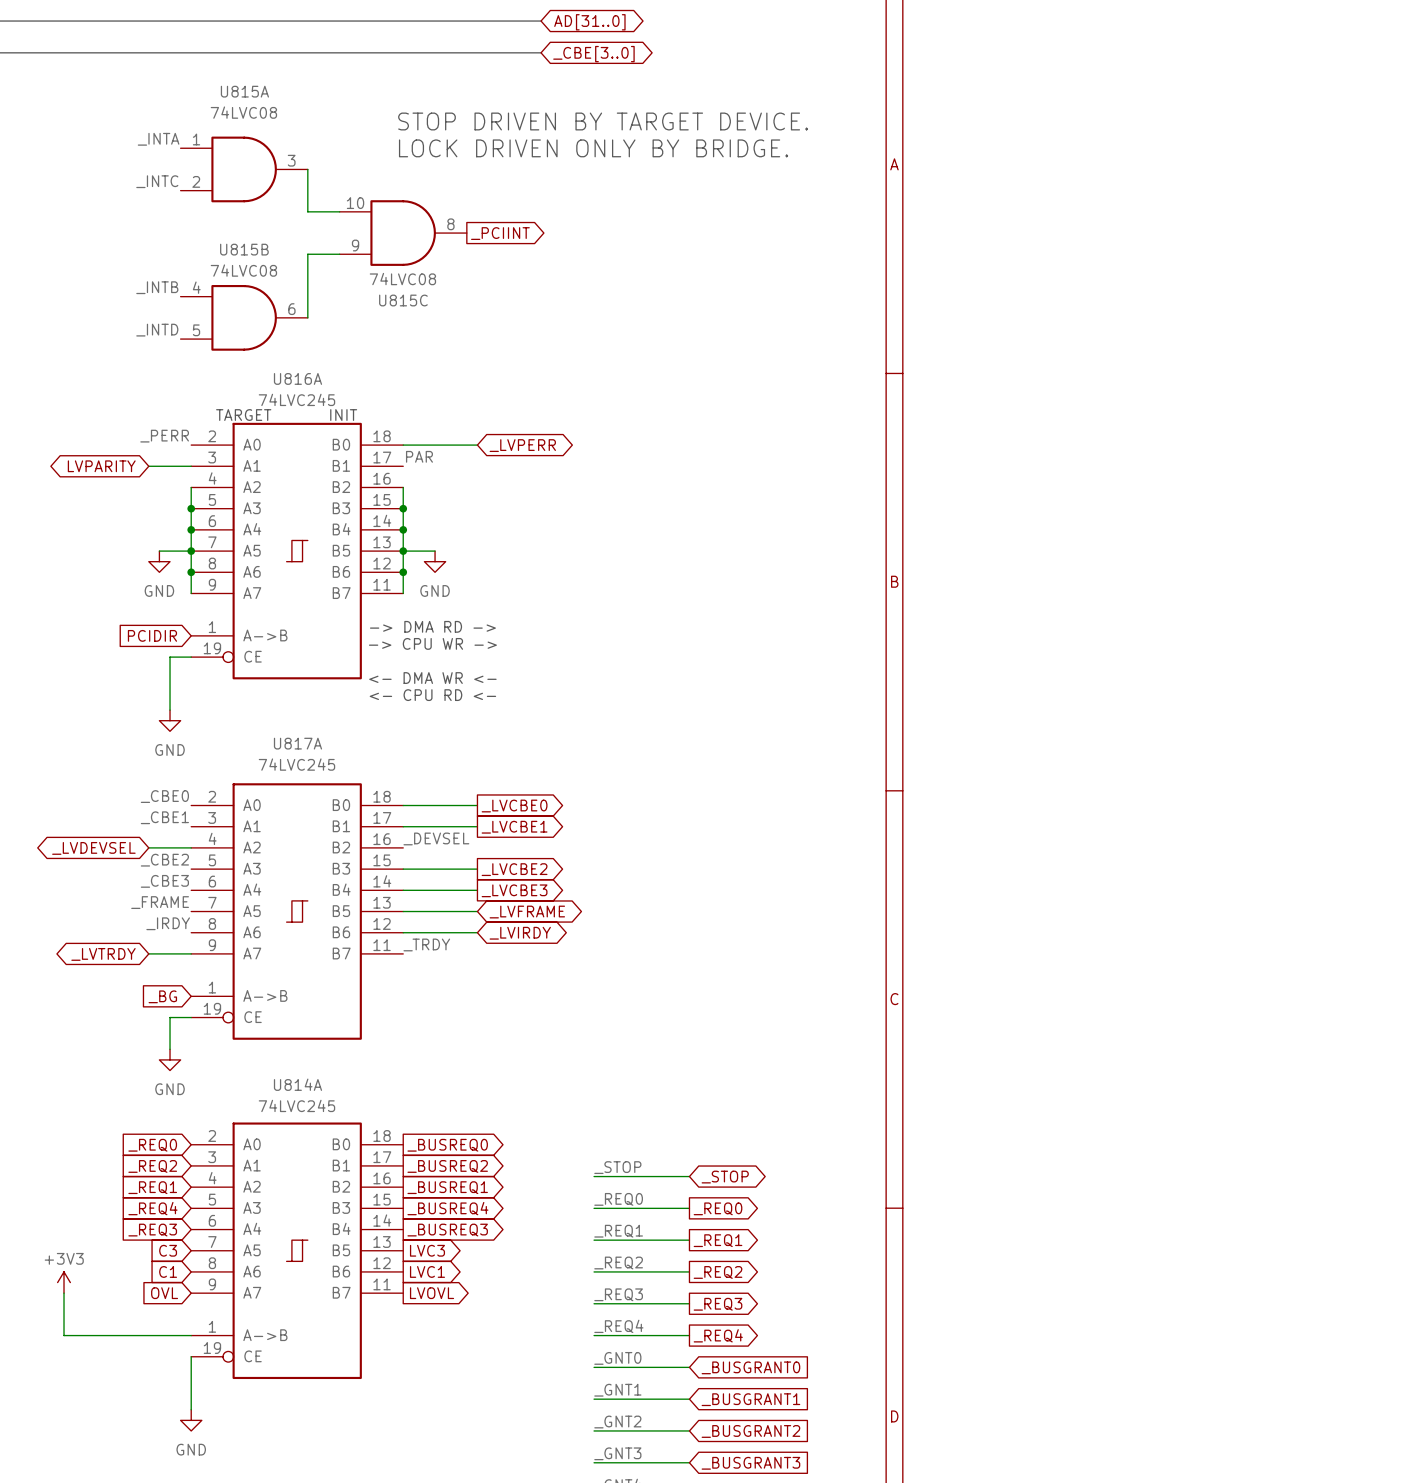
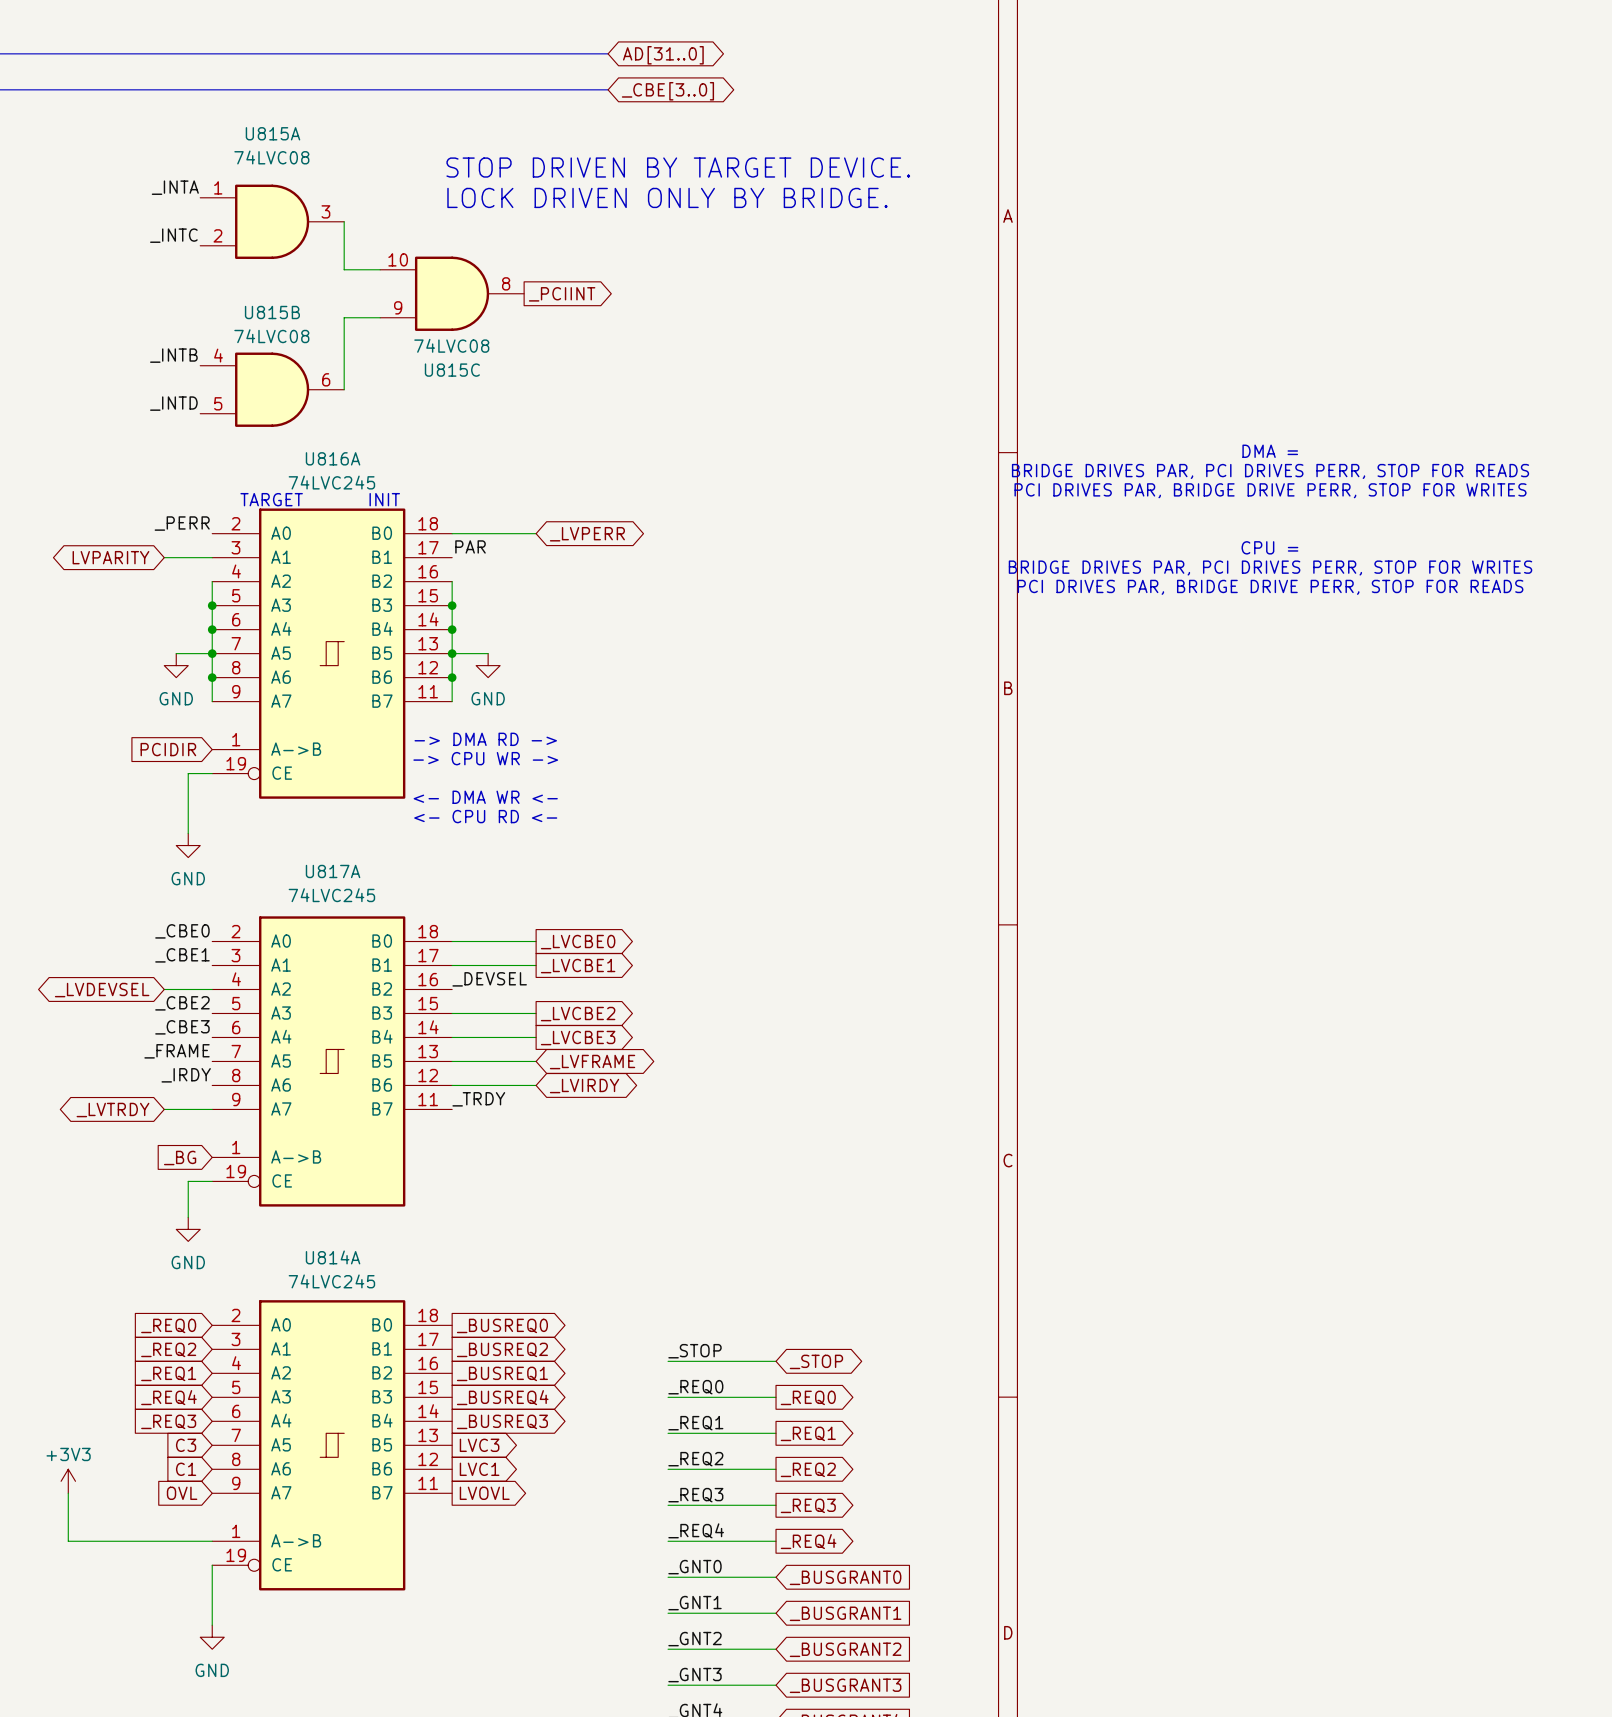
text: none -> DMA = (1270, 451)
text: none -> BRIDGE DRIVES PAR, PCI DRIVES PERR, STOP FOR READS (1270, 471)
text: none -> PCI DRIVES PAR, BRIDGE DRIVE PERR, STOP FOR WRITES (1270, 490)
text: none -> CPU = (1269, 547)
text: none -> BRIDGE DRIVES PAR, PCI DRIVES PERR, STOP FOR WRITES (1270, 568)
text: none -> PCI DRIVES PAR, BRIDGE DRIVE PERR, STOP FOR READS (1270, 587)

